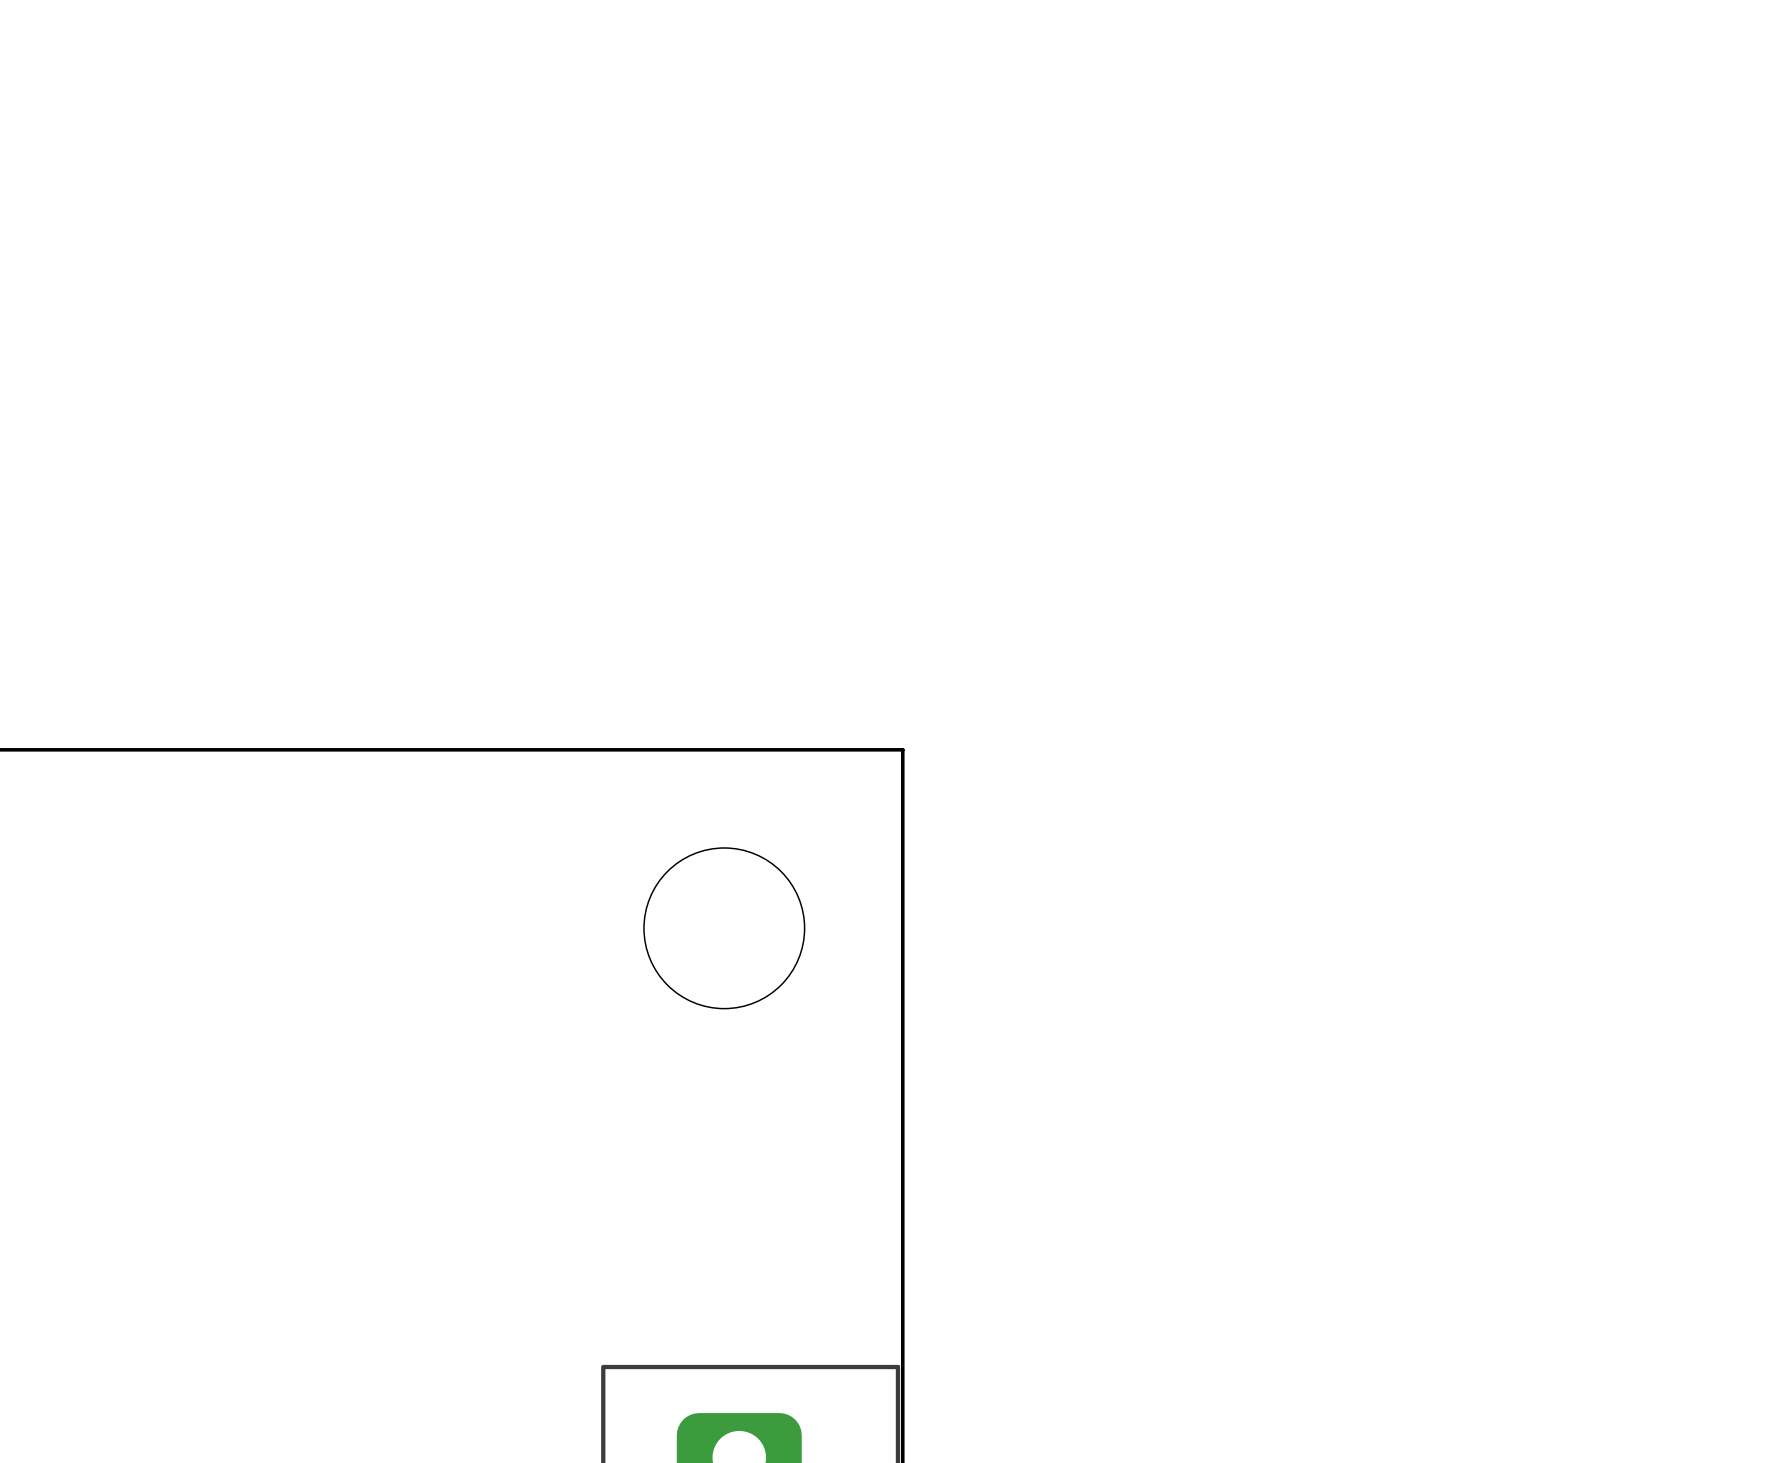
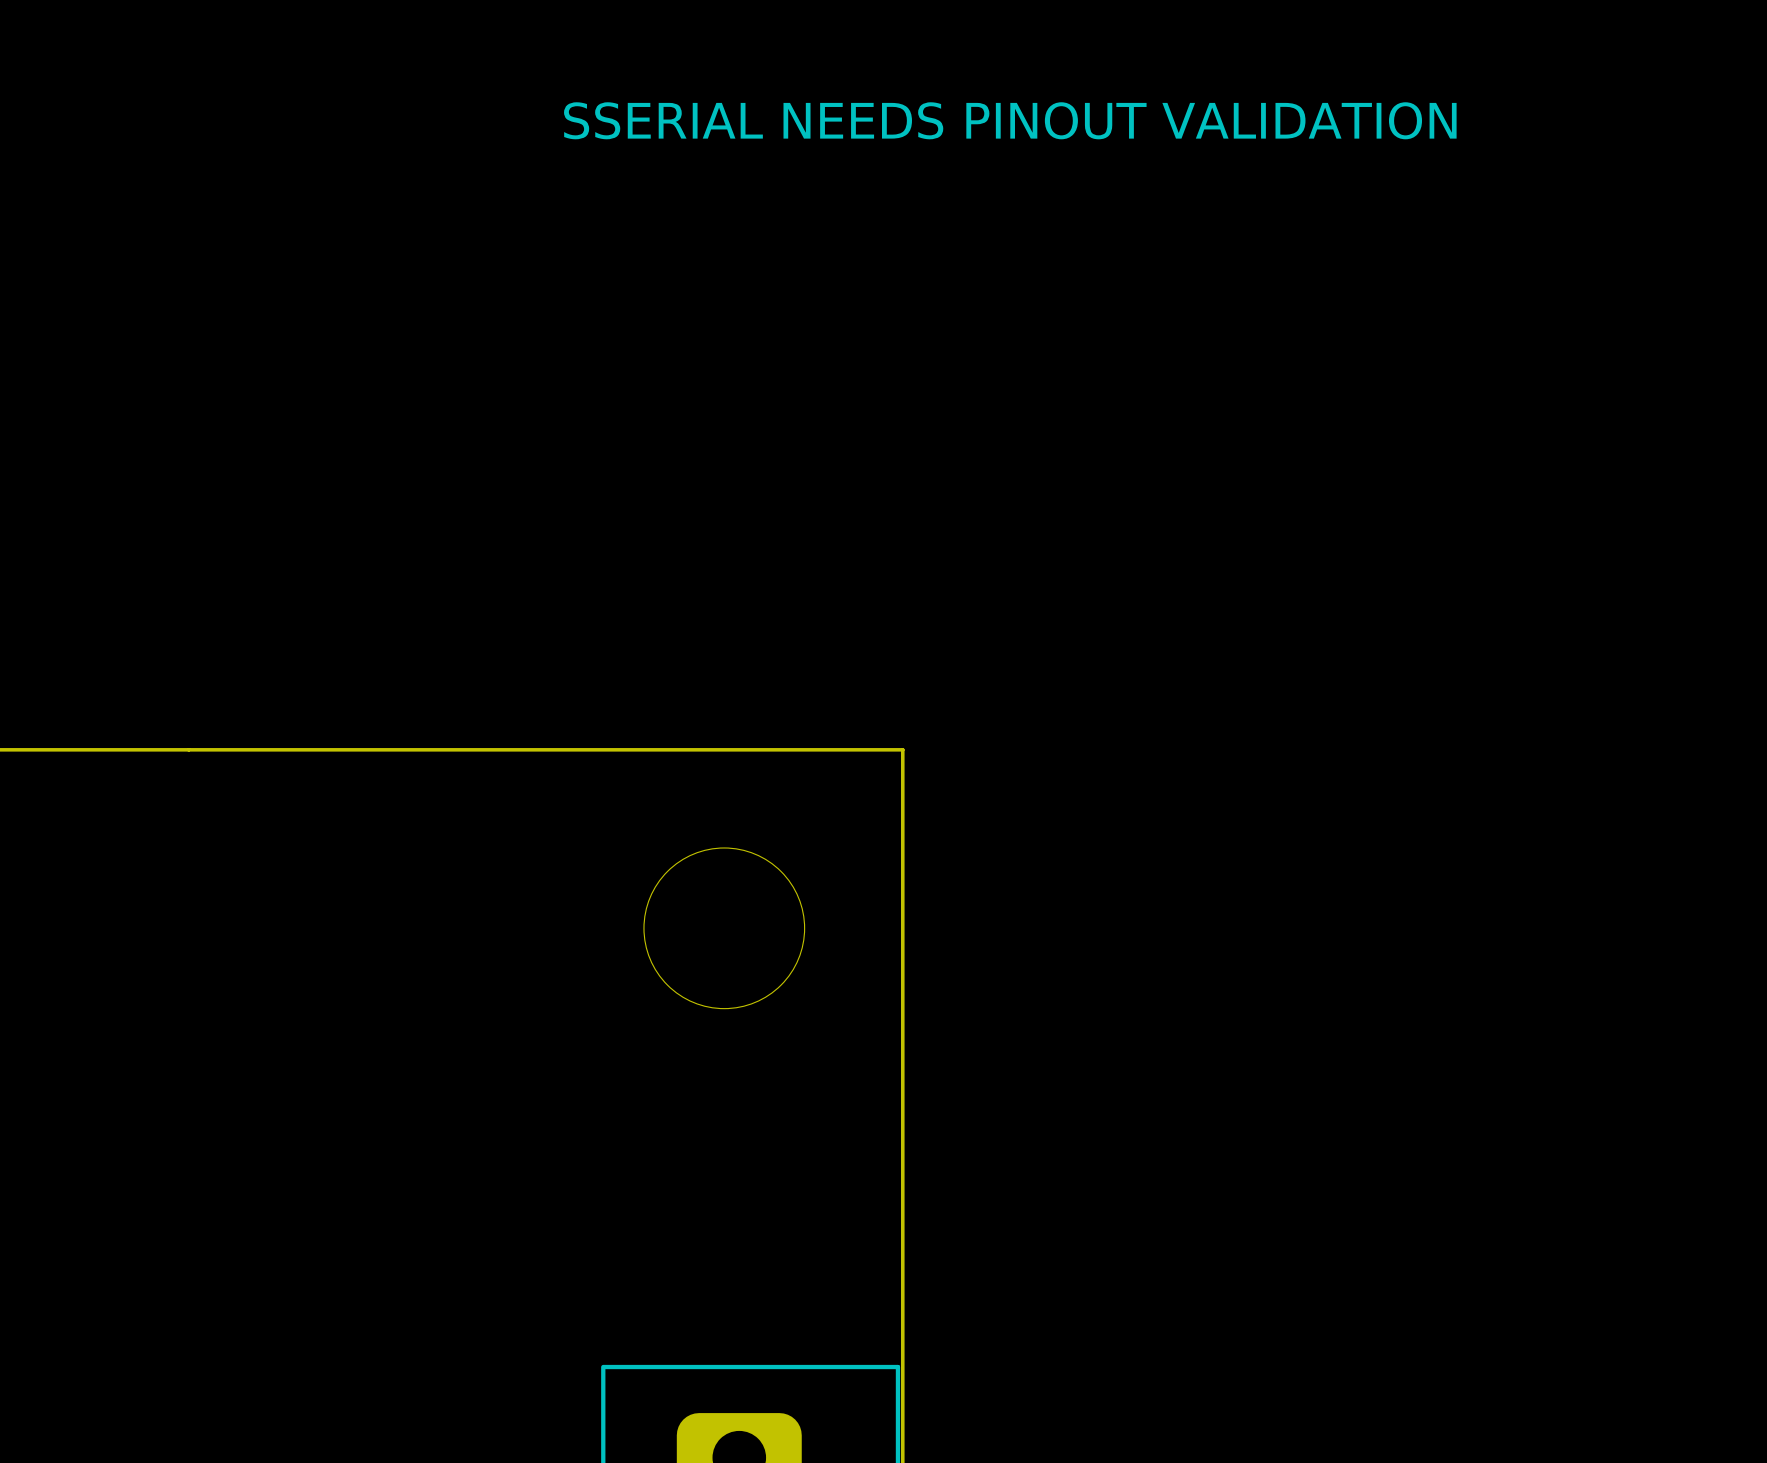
text: none -> SSERIAL NEEDS PINOUT VALIDATION (1010, 120)

